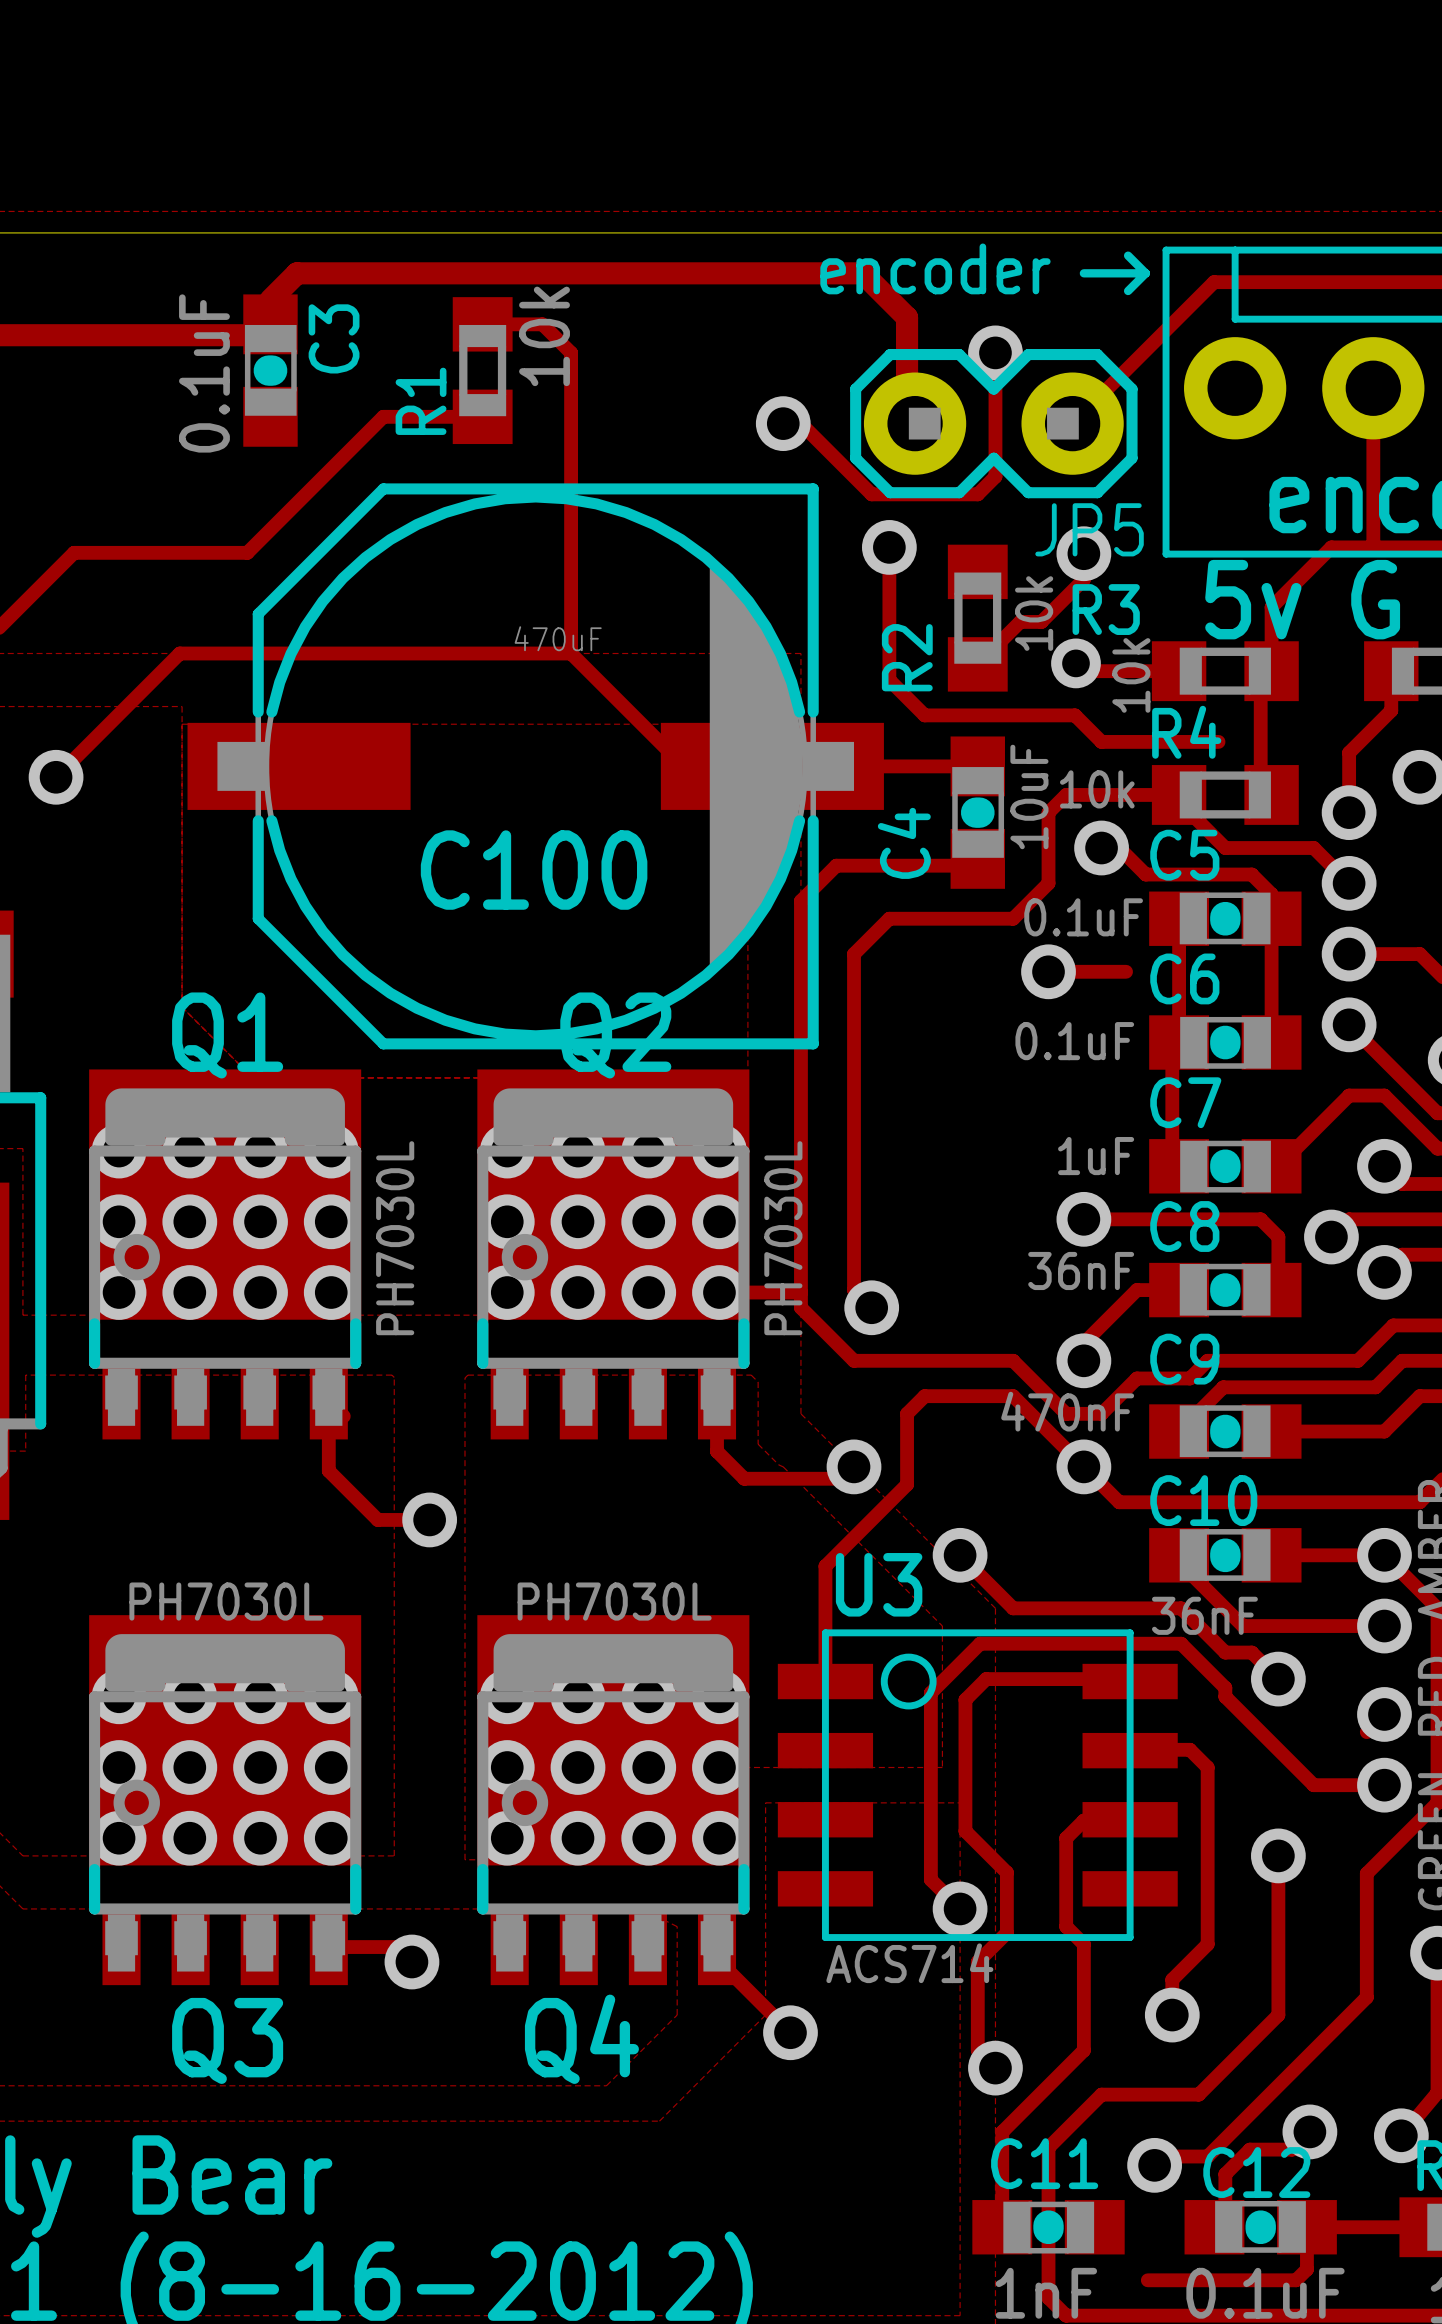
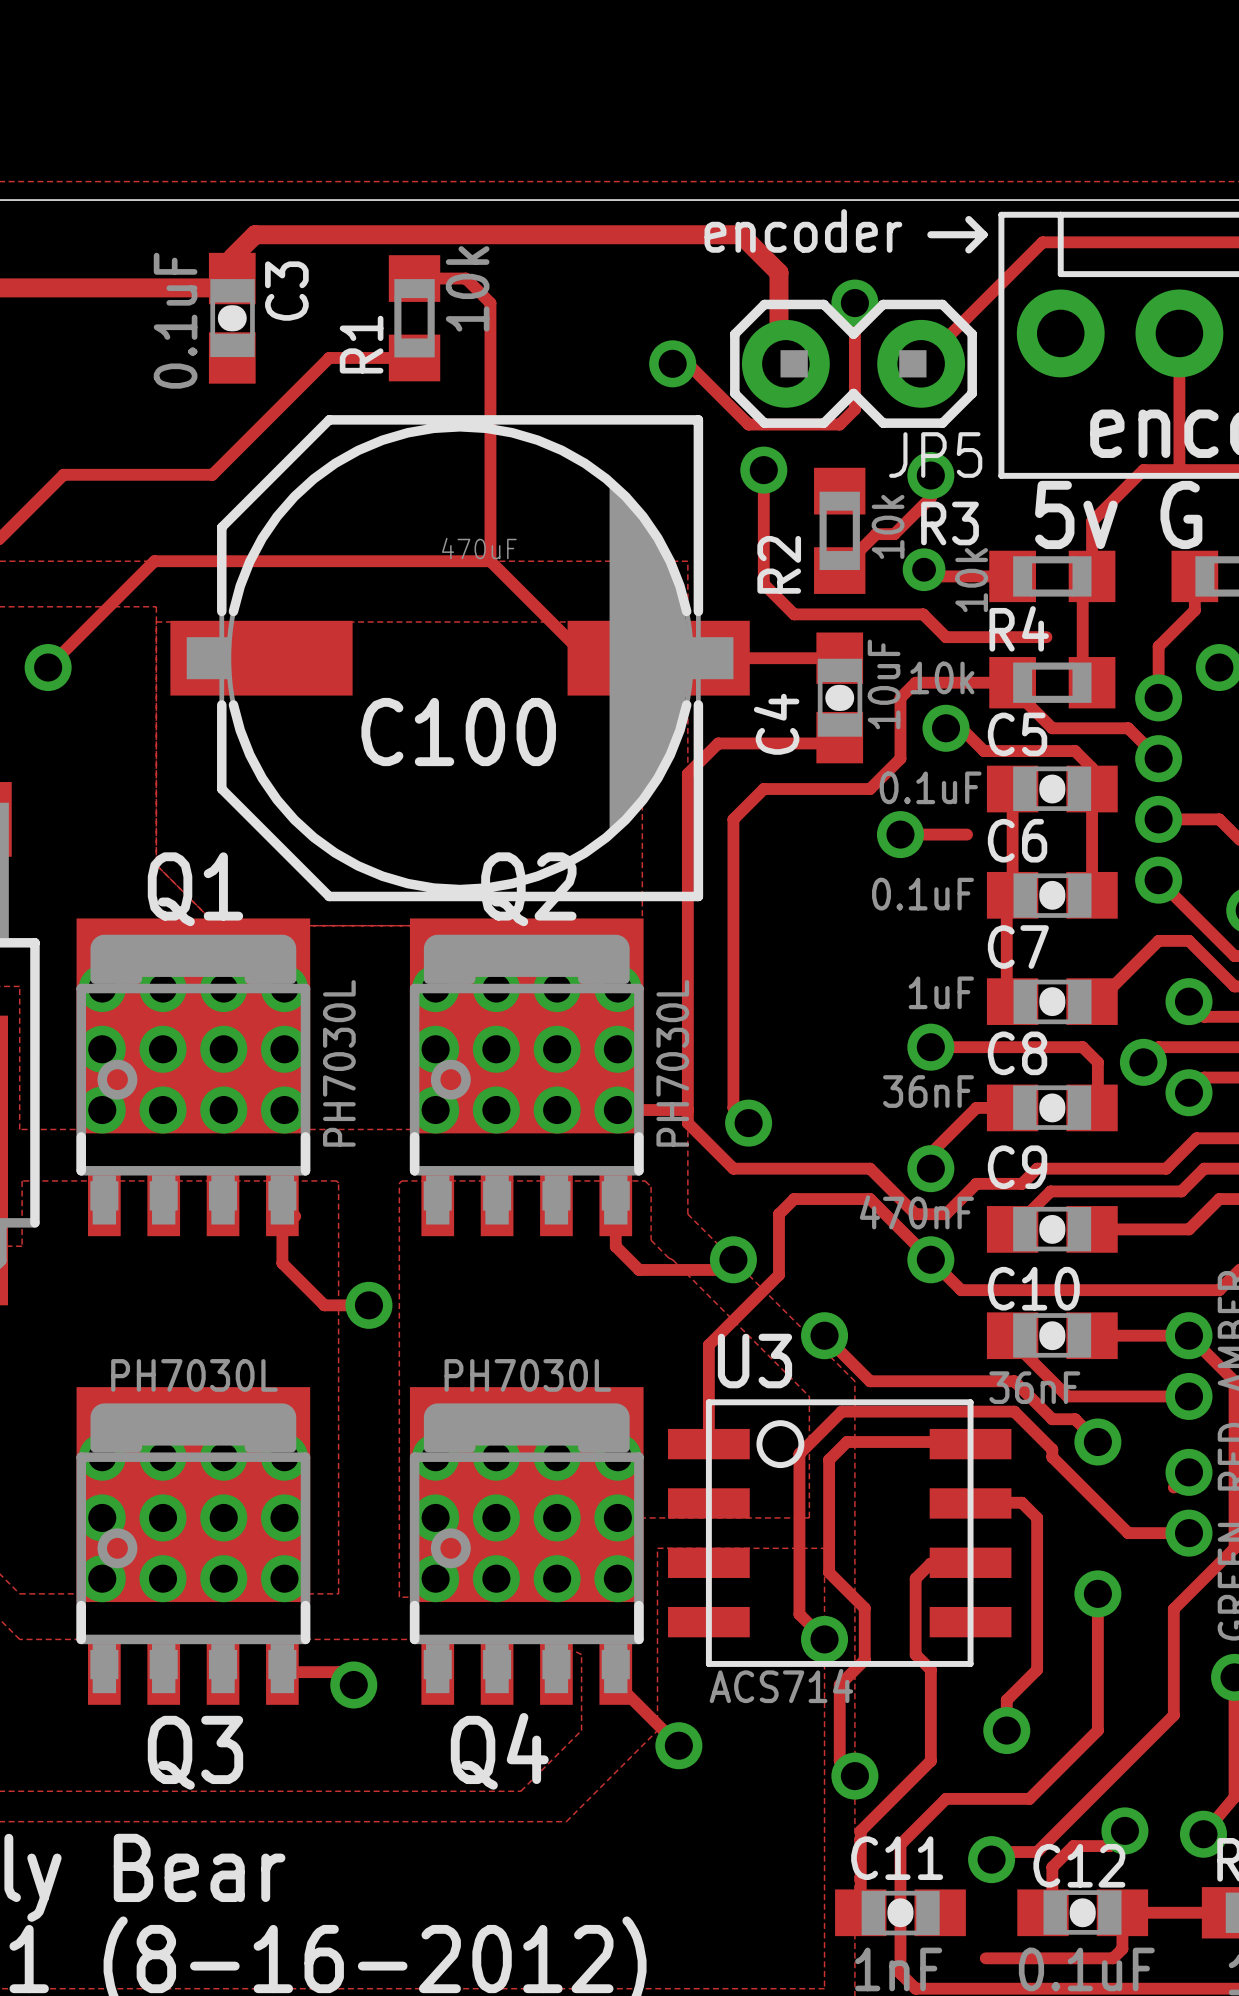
C100 footprint: [187, 483, 884, 1050] -> [170, 415, 750, 902]
C100 name position: C100 (534, 870) -> C100 (458, 732)

